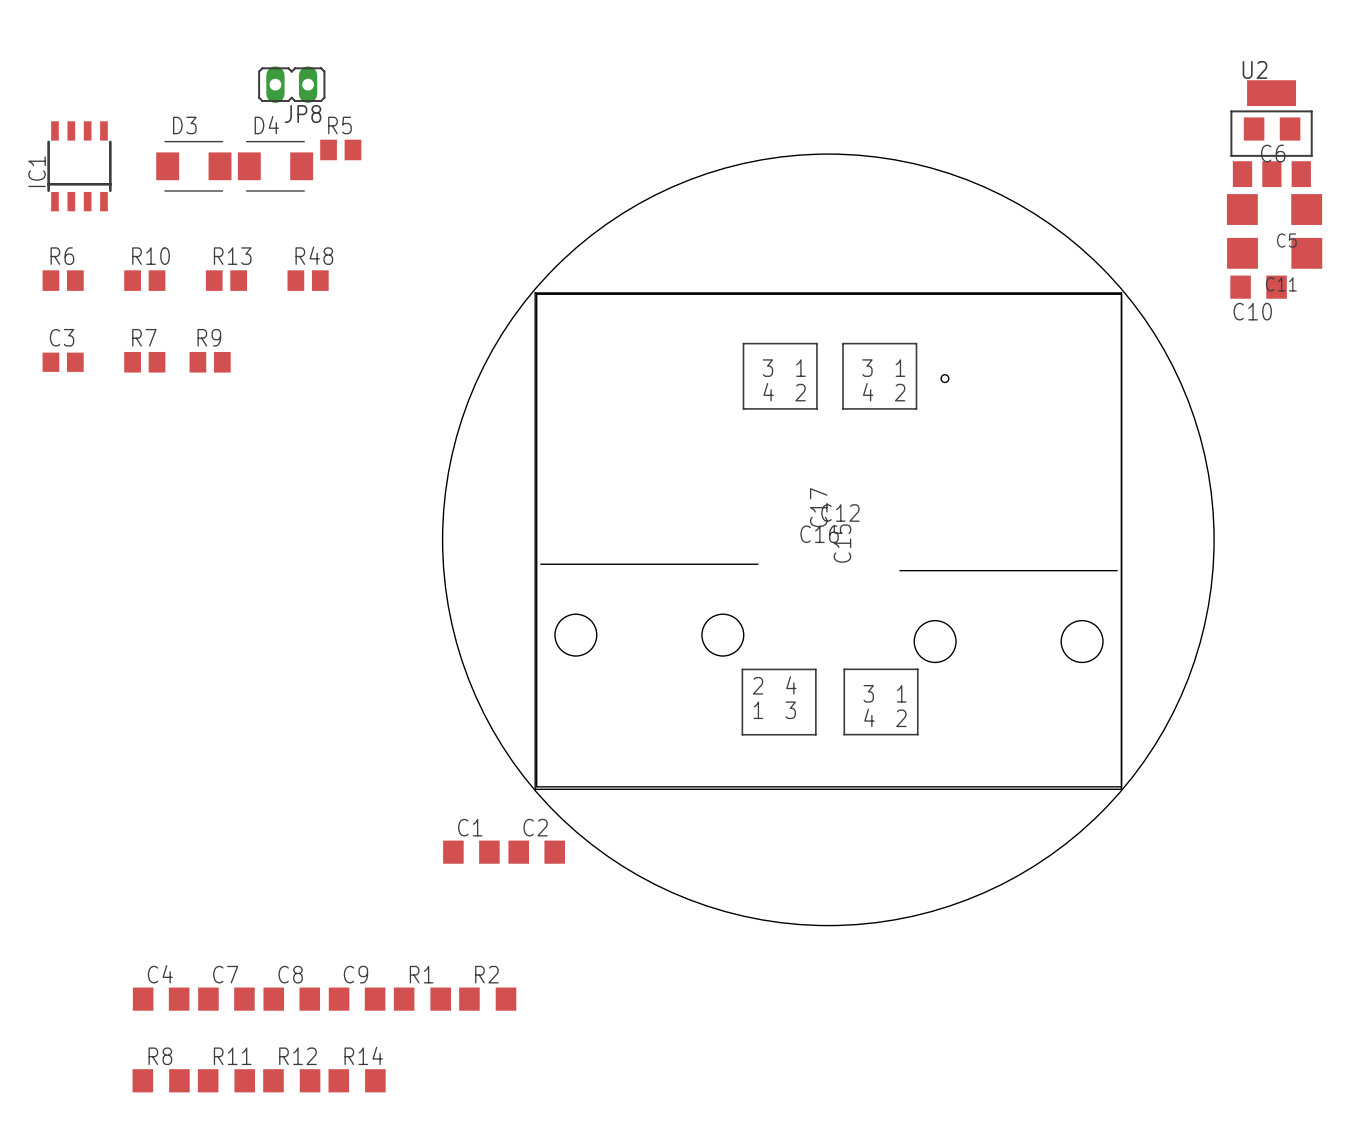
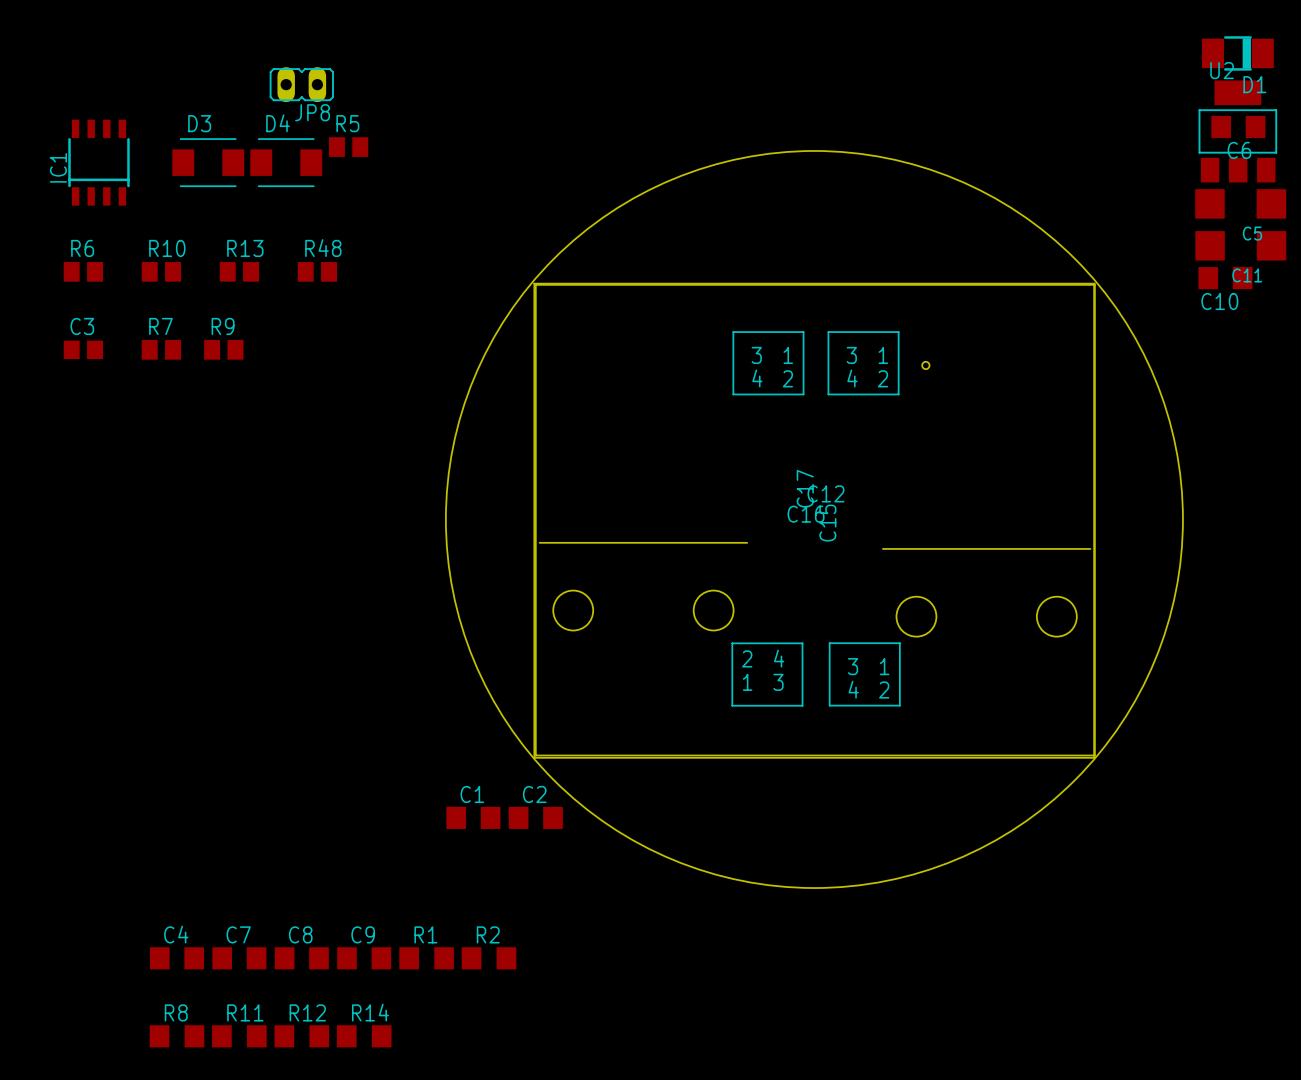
D1: none -> (1237, 53)

